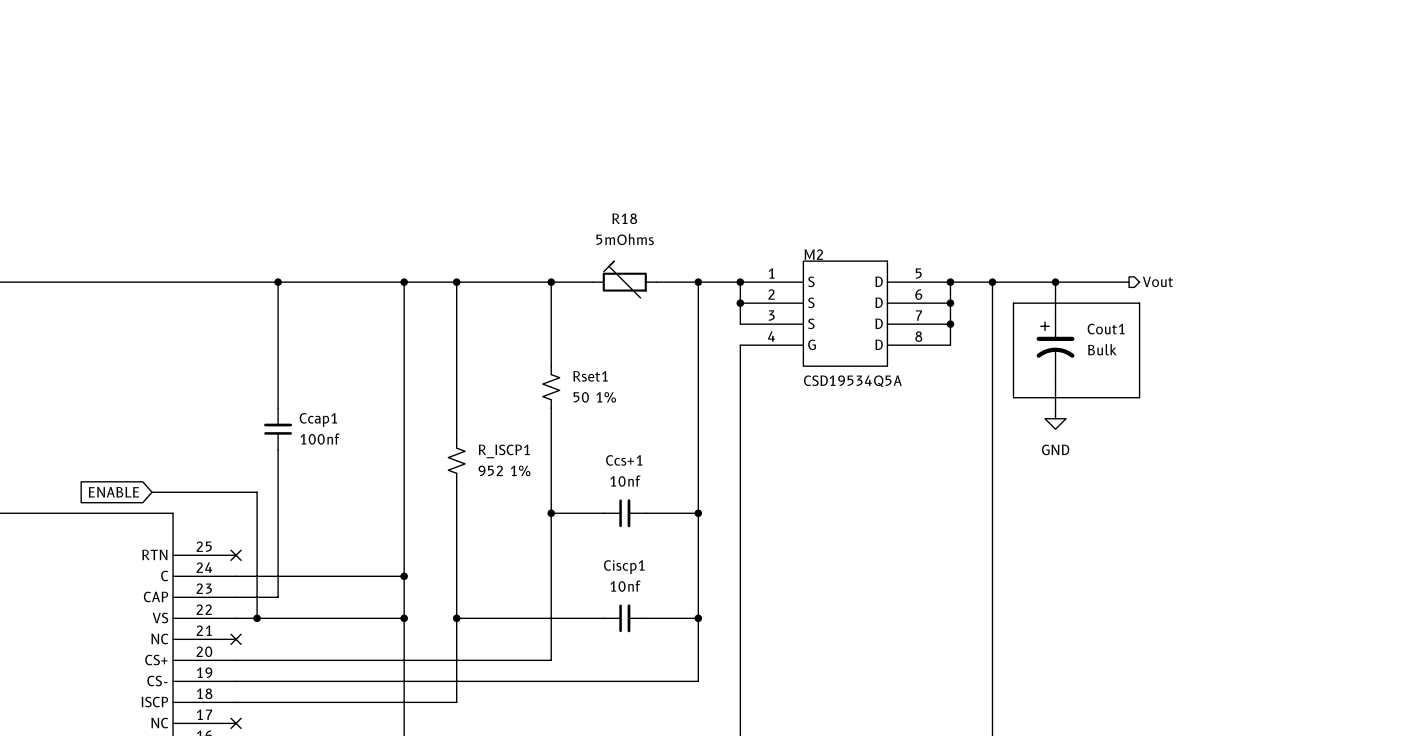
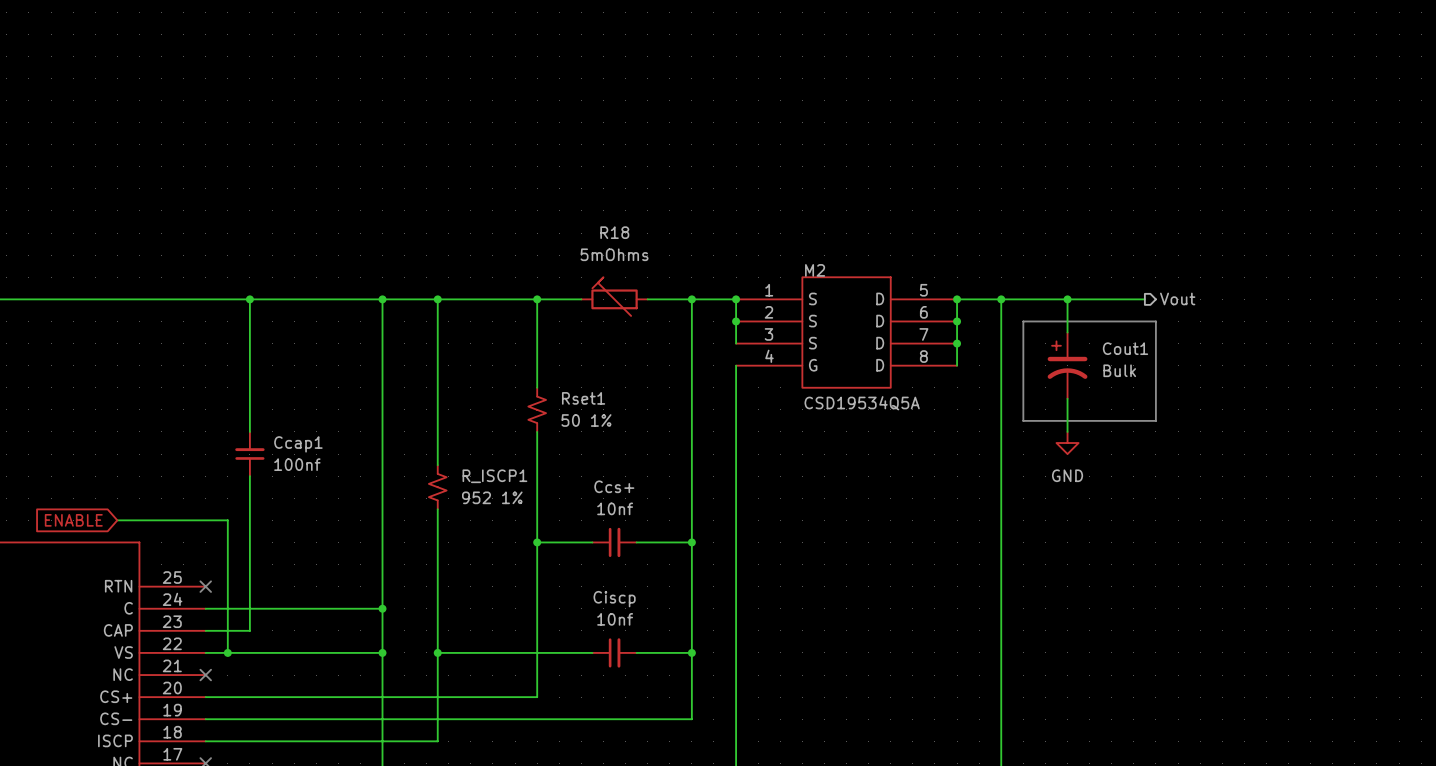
Ccs+1 name: Ccs+1 (624, 460) -> Ccs+ (614, 486)
Ciscp1 name: Ciscp1 (624, 567) -> Ciscp (614, 599)

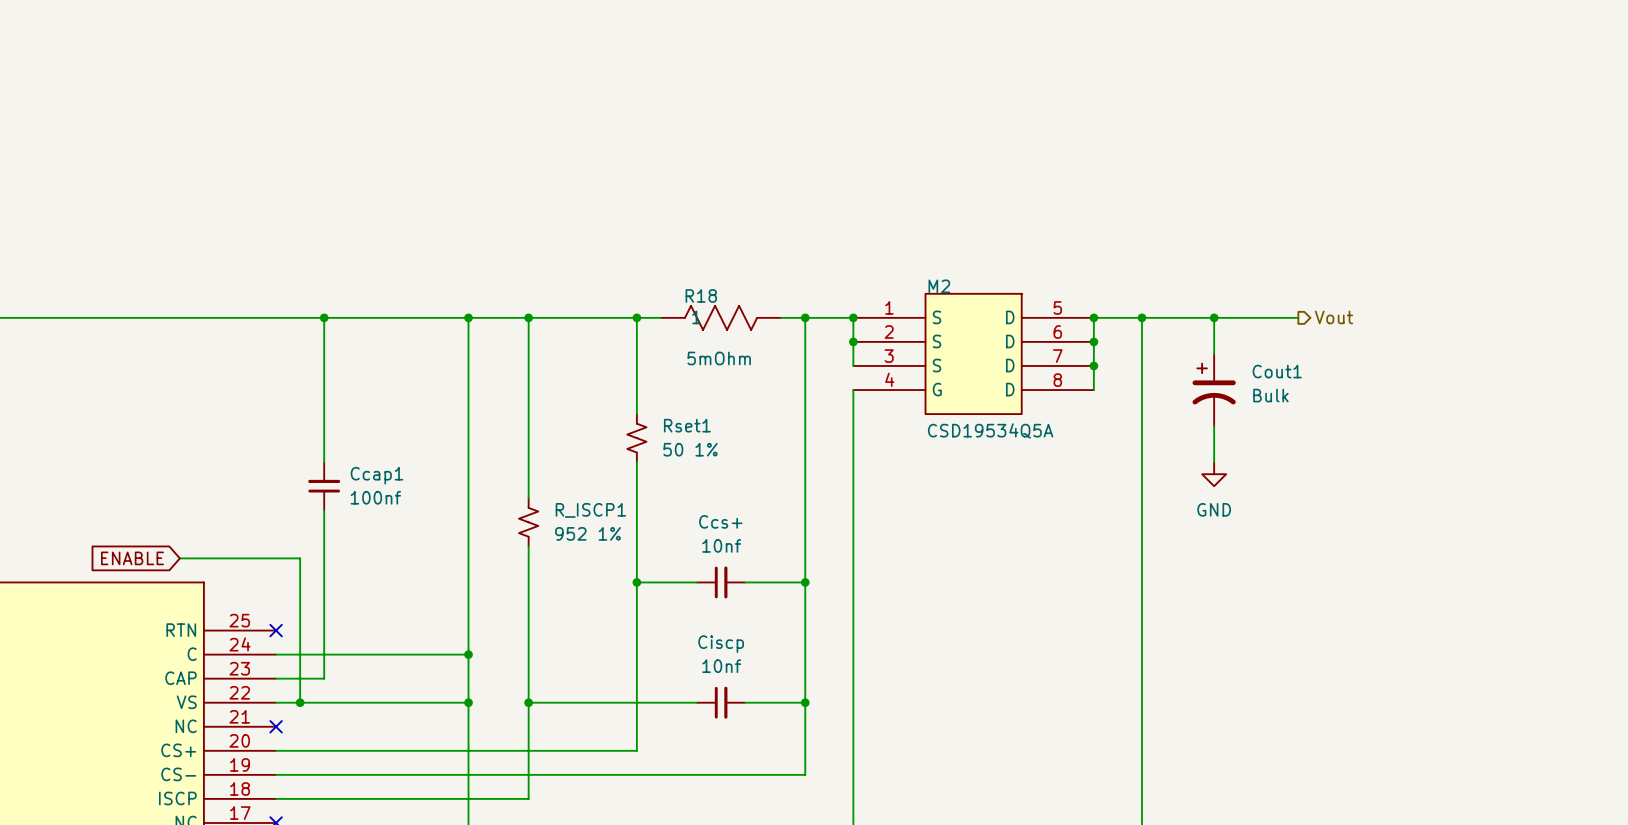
R18 name position: R18 (614, 232) -> R18 (701, 295)
R18 value: 5mOhms (614, 254) -> 5mOhm (719, 358)
R18 symbol: [581, 277, 648, 316] -> [660, 305, 782, 330]
line: (1023, 321) (1155, 321) (1155, 420) (1023, 420) (1023, 321) -> none

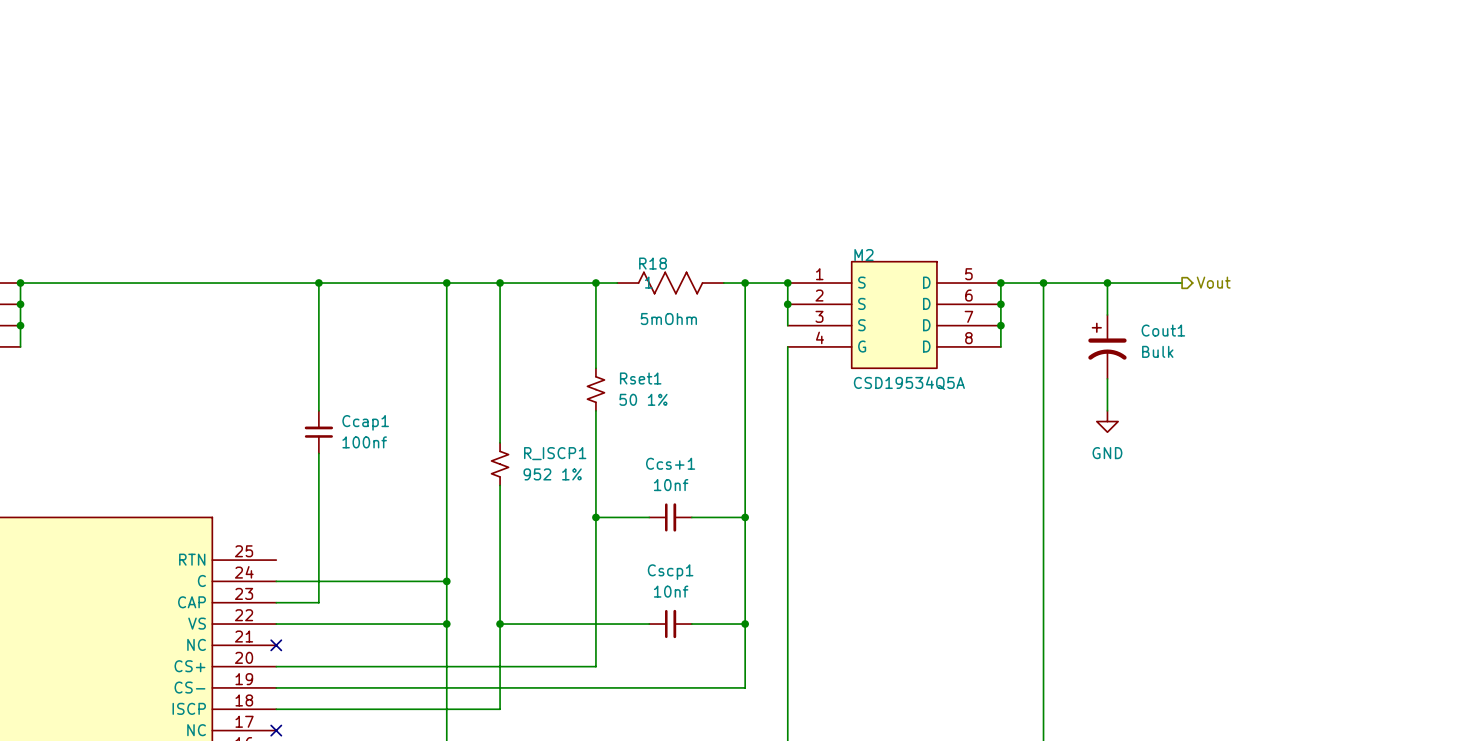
Ccs+ name: Ccs+ (720, 521) -> Ccs+1 (670, 463)
global label: ENABLE (132, 558) -> none
wire: (179, 558) (300, 558) (300, 702) -> none
no-connect mark: (276, 630) -> none
Ciscp name: Ciscp (721, 644) -> Cscp1 (670, 572)
junction: (300, 702) -> none

